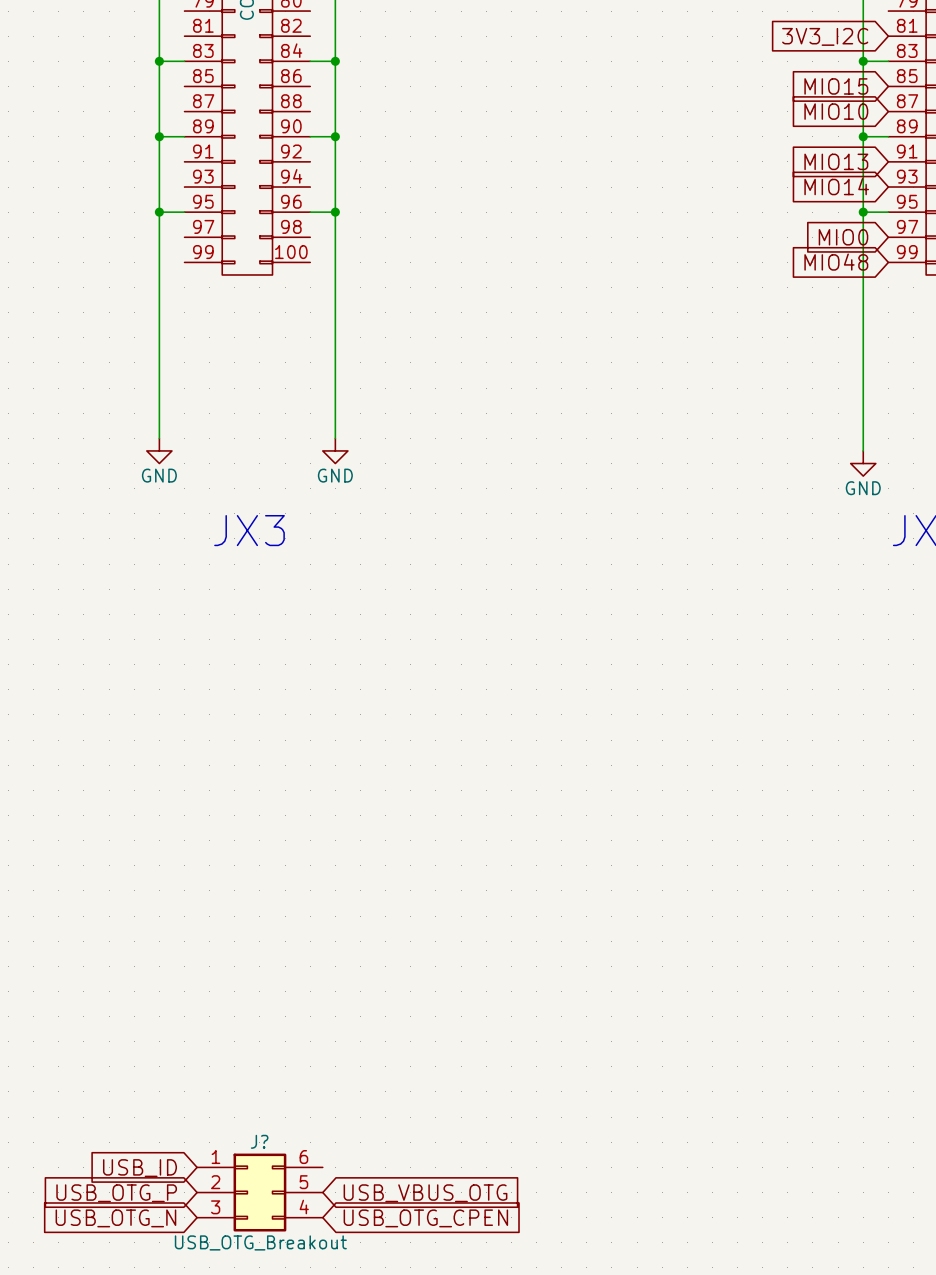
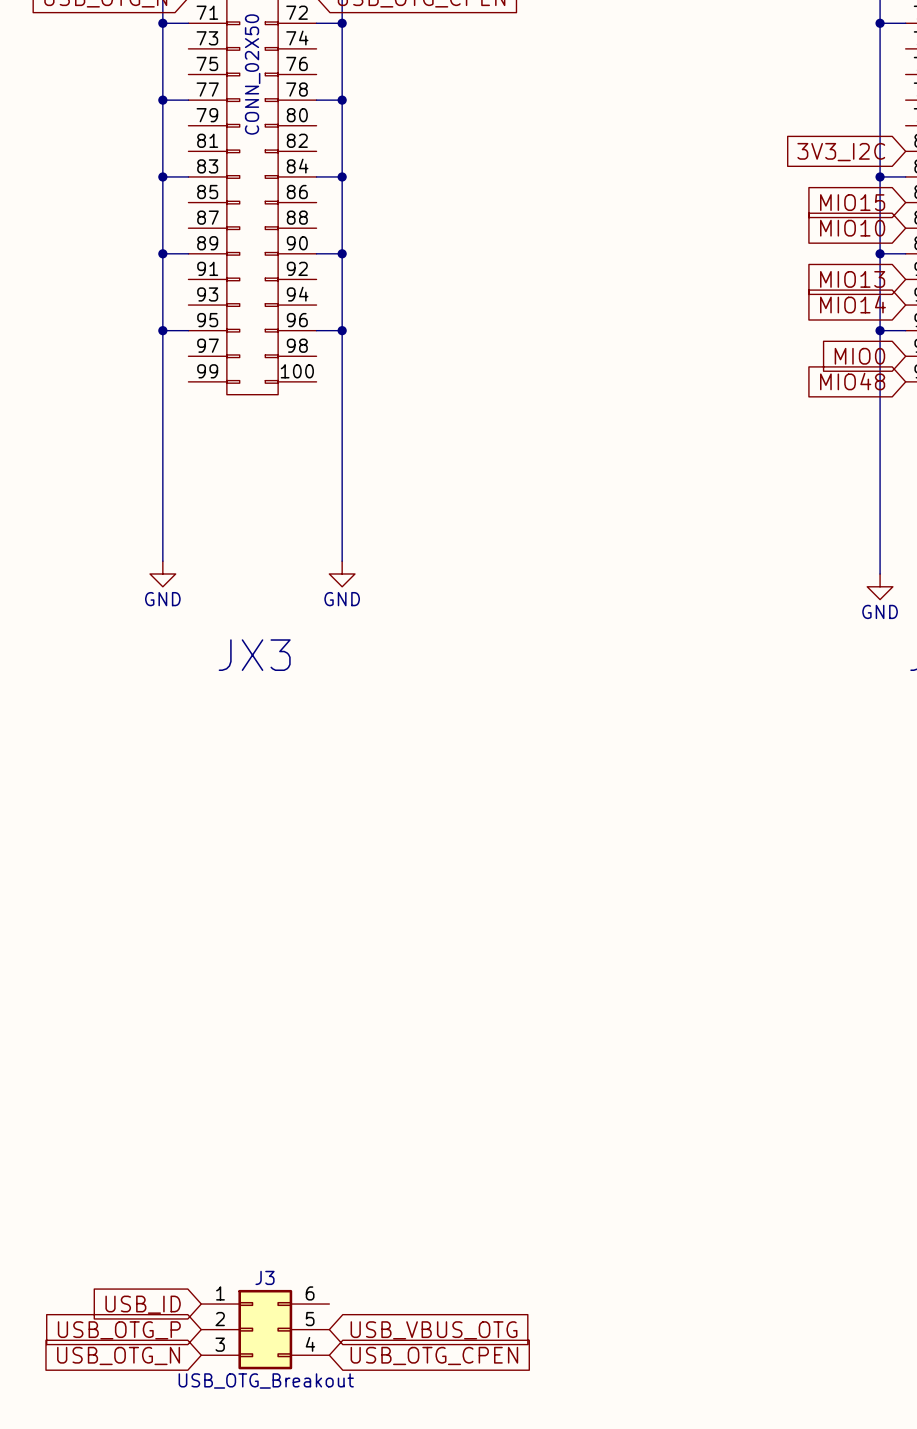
J? name: J? (259, 1141) -> J3 (265, 1277)

